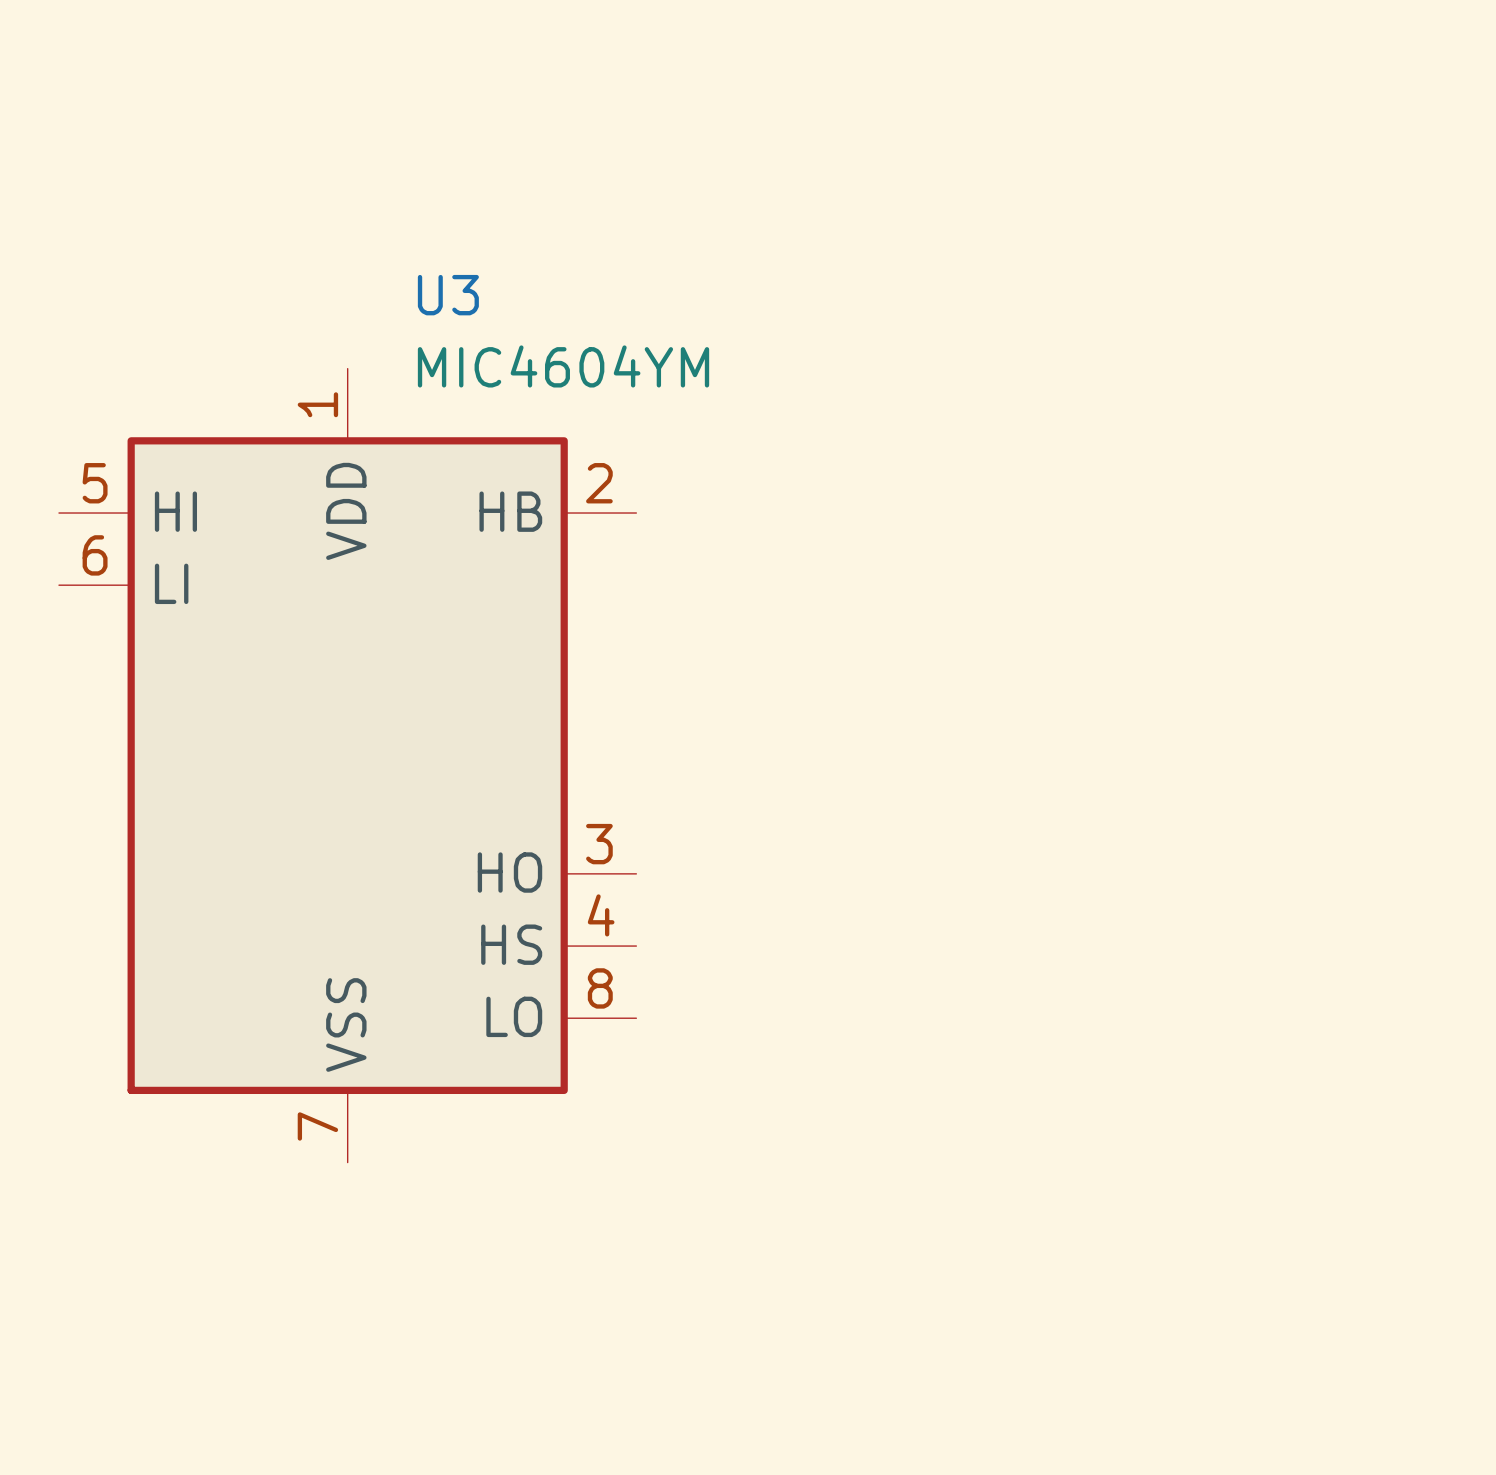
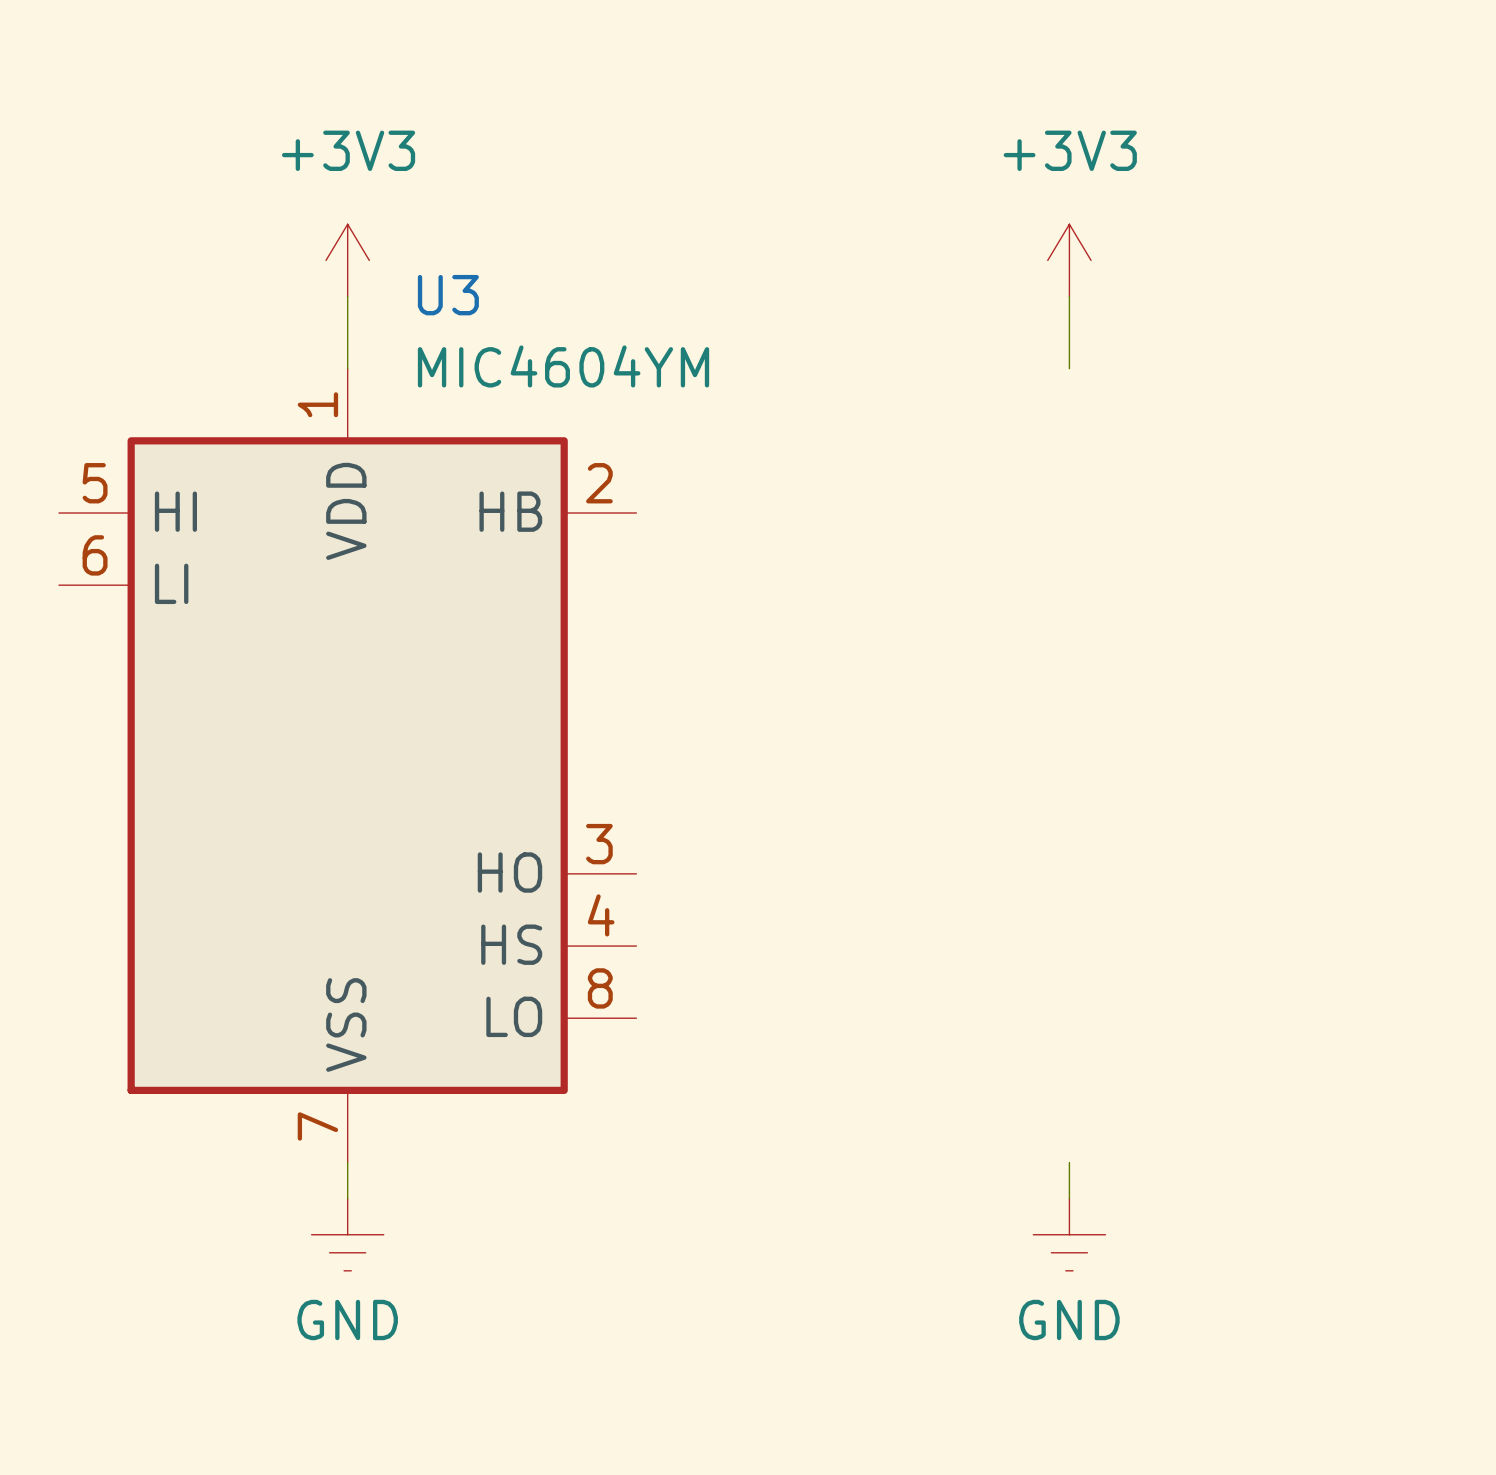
power symbol: none -> +3V3 (347, 260)
power symbol: none -> +3V3 (1069, 260)
wire: none -> (347, 296) (347, 368)
wire: none -> (1069, 296) (1069, 368)
wire: none -> (347, 1162) (347, 1198)
wire: none -> (1069, 1162) (1069, 1198)
power symbol: none -> GND (347, 1234)
power symbol: none -> GND (1069, 1234)

